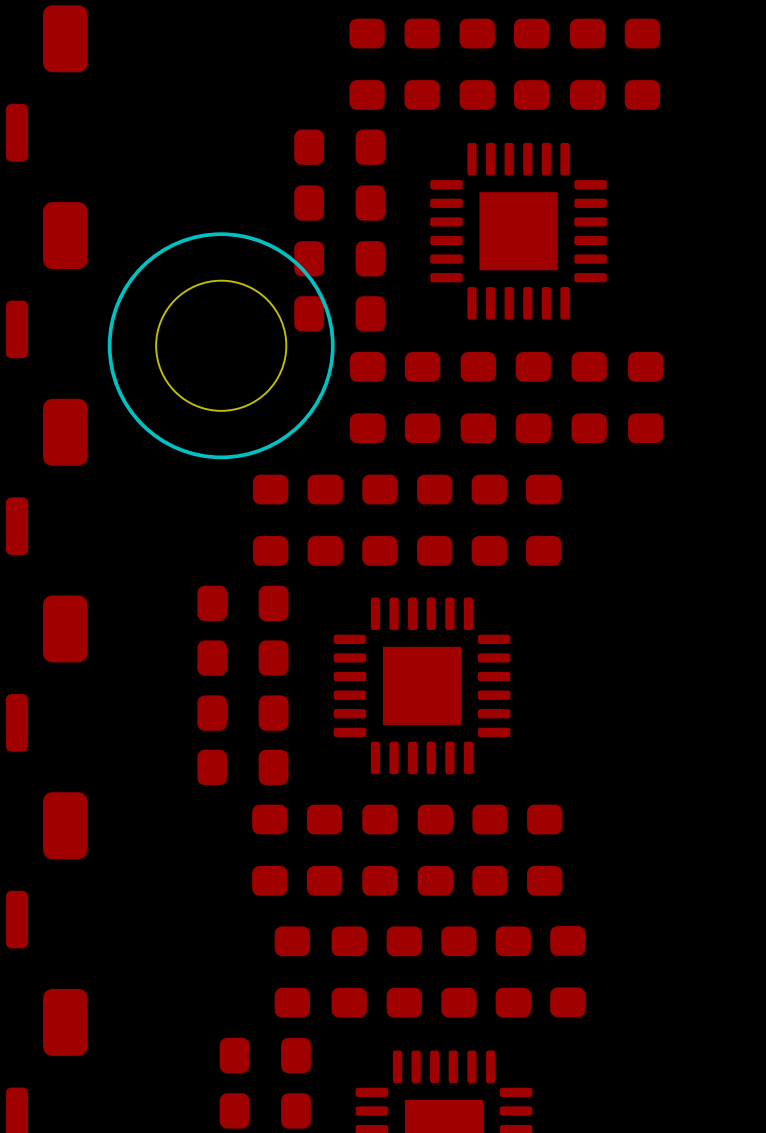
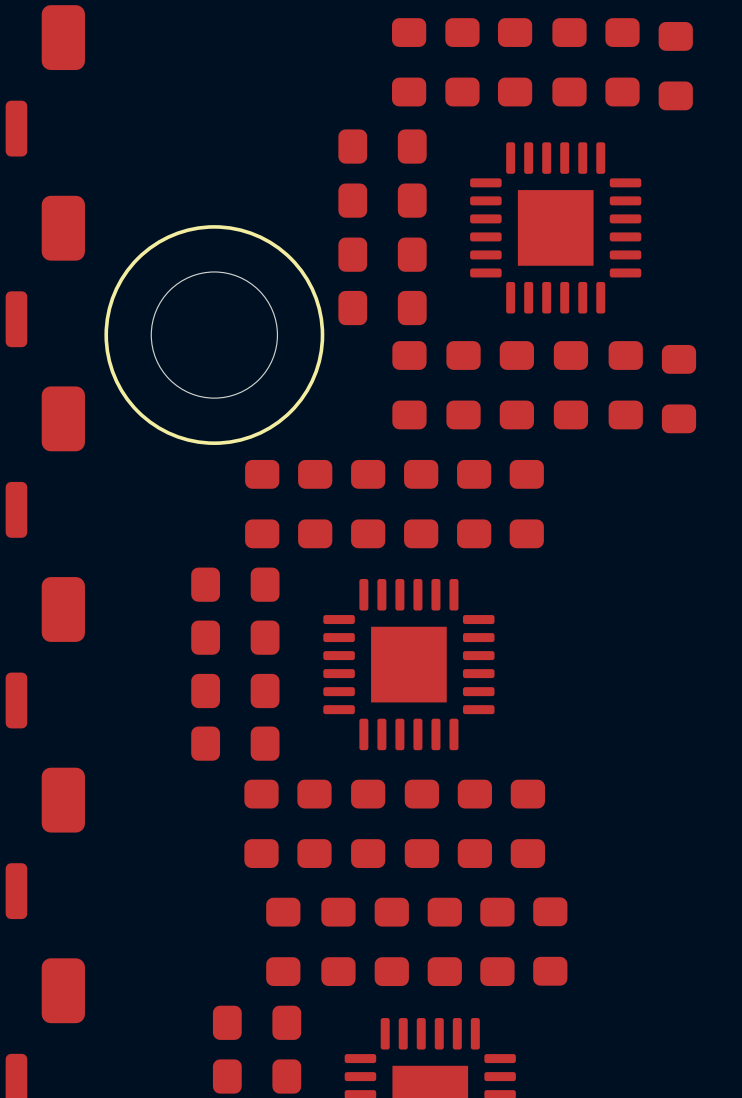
part: (367, 64) -> none
part: none -> (675, 66)
part: (339, 147) -> none
part: none -> (382, 146)
part: (339, 203) -> none
part: none -> (382, 200)
part position: (518, 231) -> (555, 227)
part: (339, 258) -> none
part: none -> (382, 254)
part: (339, 313) -> none
part: none -> (382, 308)
part: (367, 397) -> none
part: none -> (678, 389)

